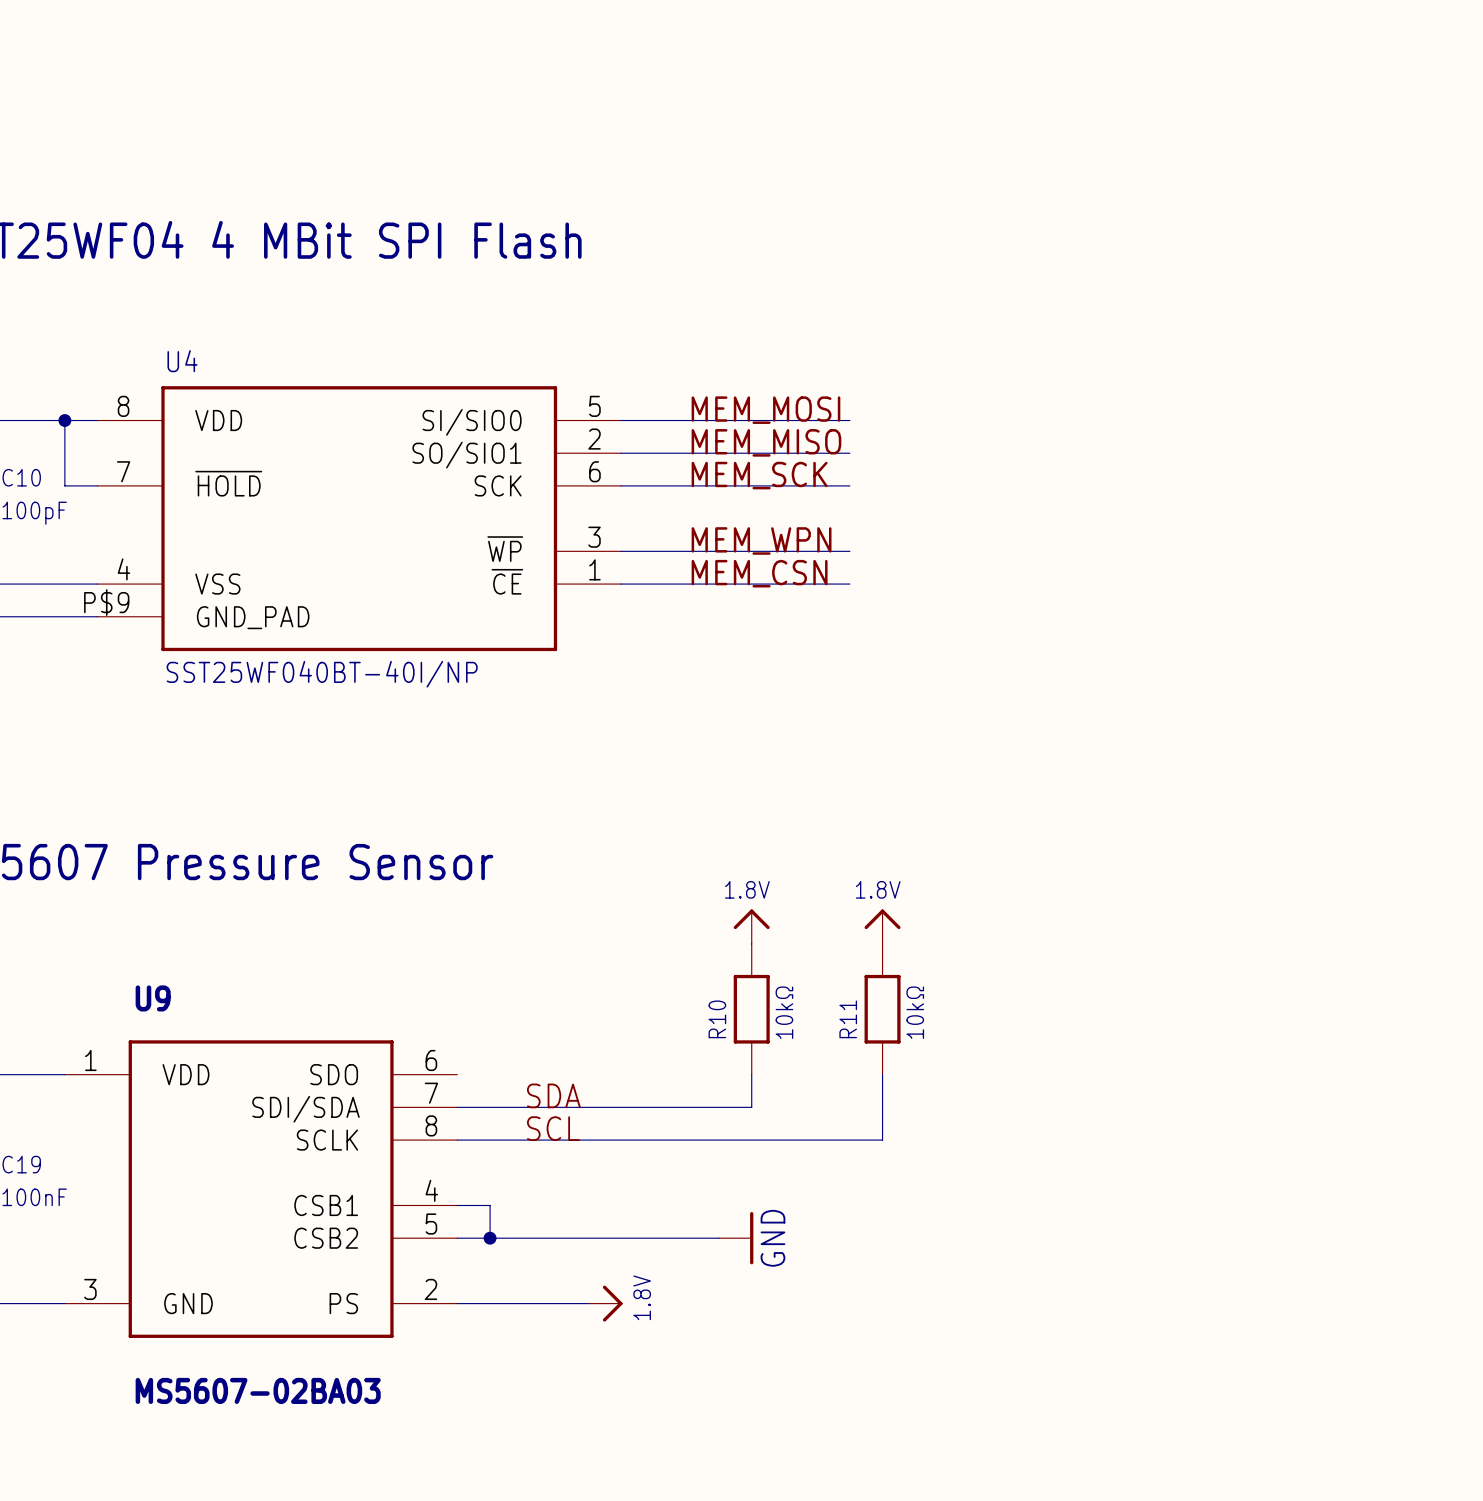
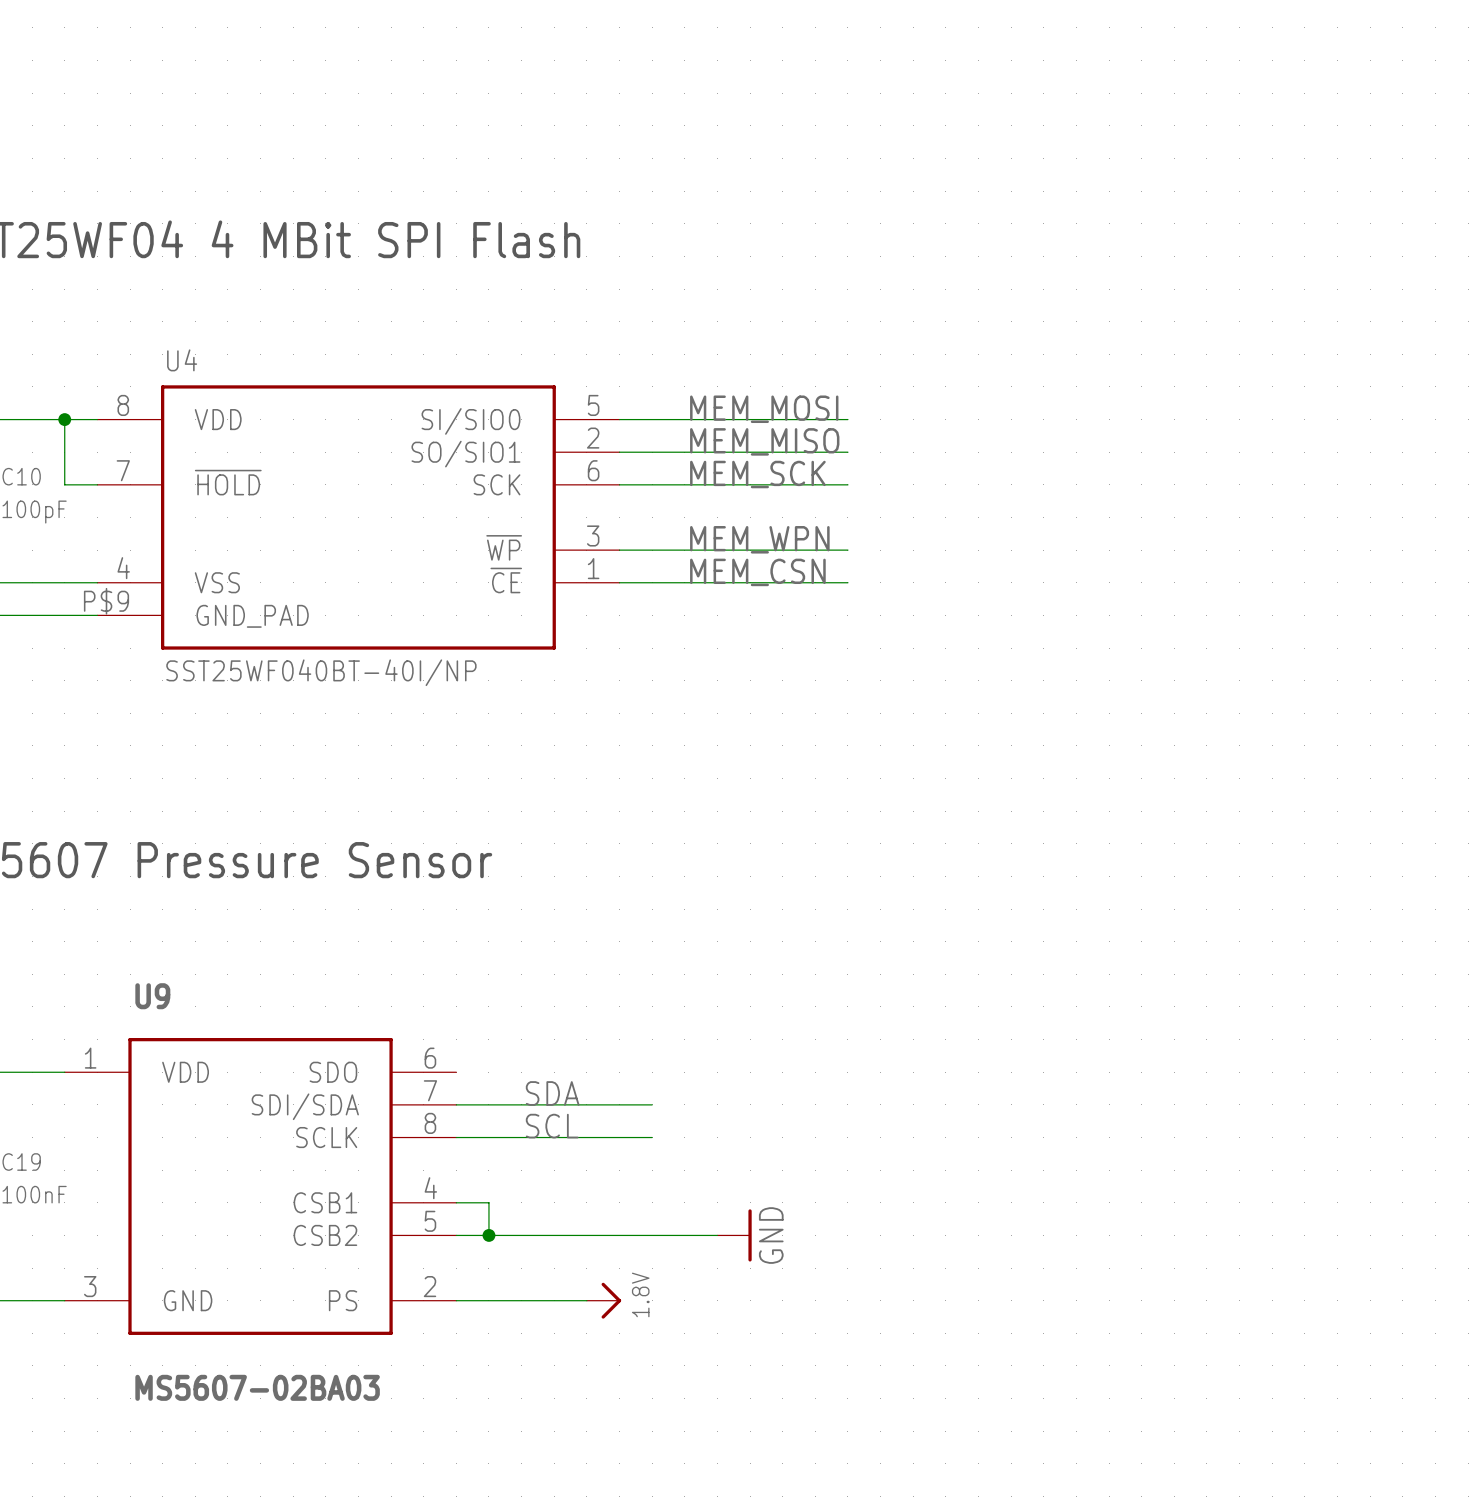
power symbol: 1.8V (751, 926) -> none
power symbol: 1.8V (882, 926) -> none
R10: 10kΩ (751, 1009) -> none
R11: 10kΩ (882, 1009) -> none
wire: (751, 1074) (751, 1107) (653, 1107) -> none
wire: (882, 1074) (882, 1140) (653, 1140) -> none

